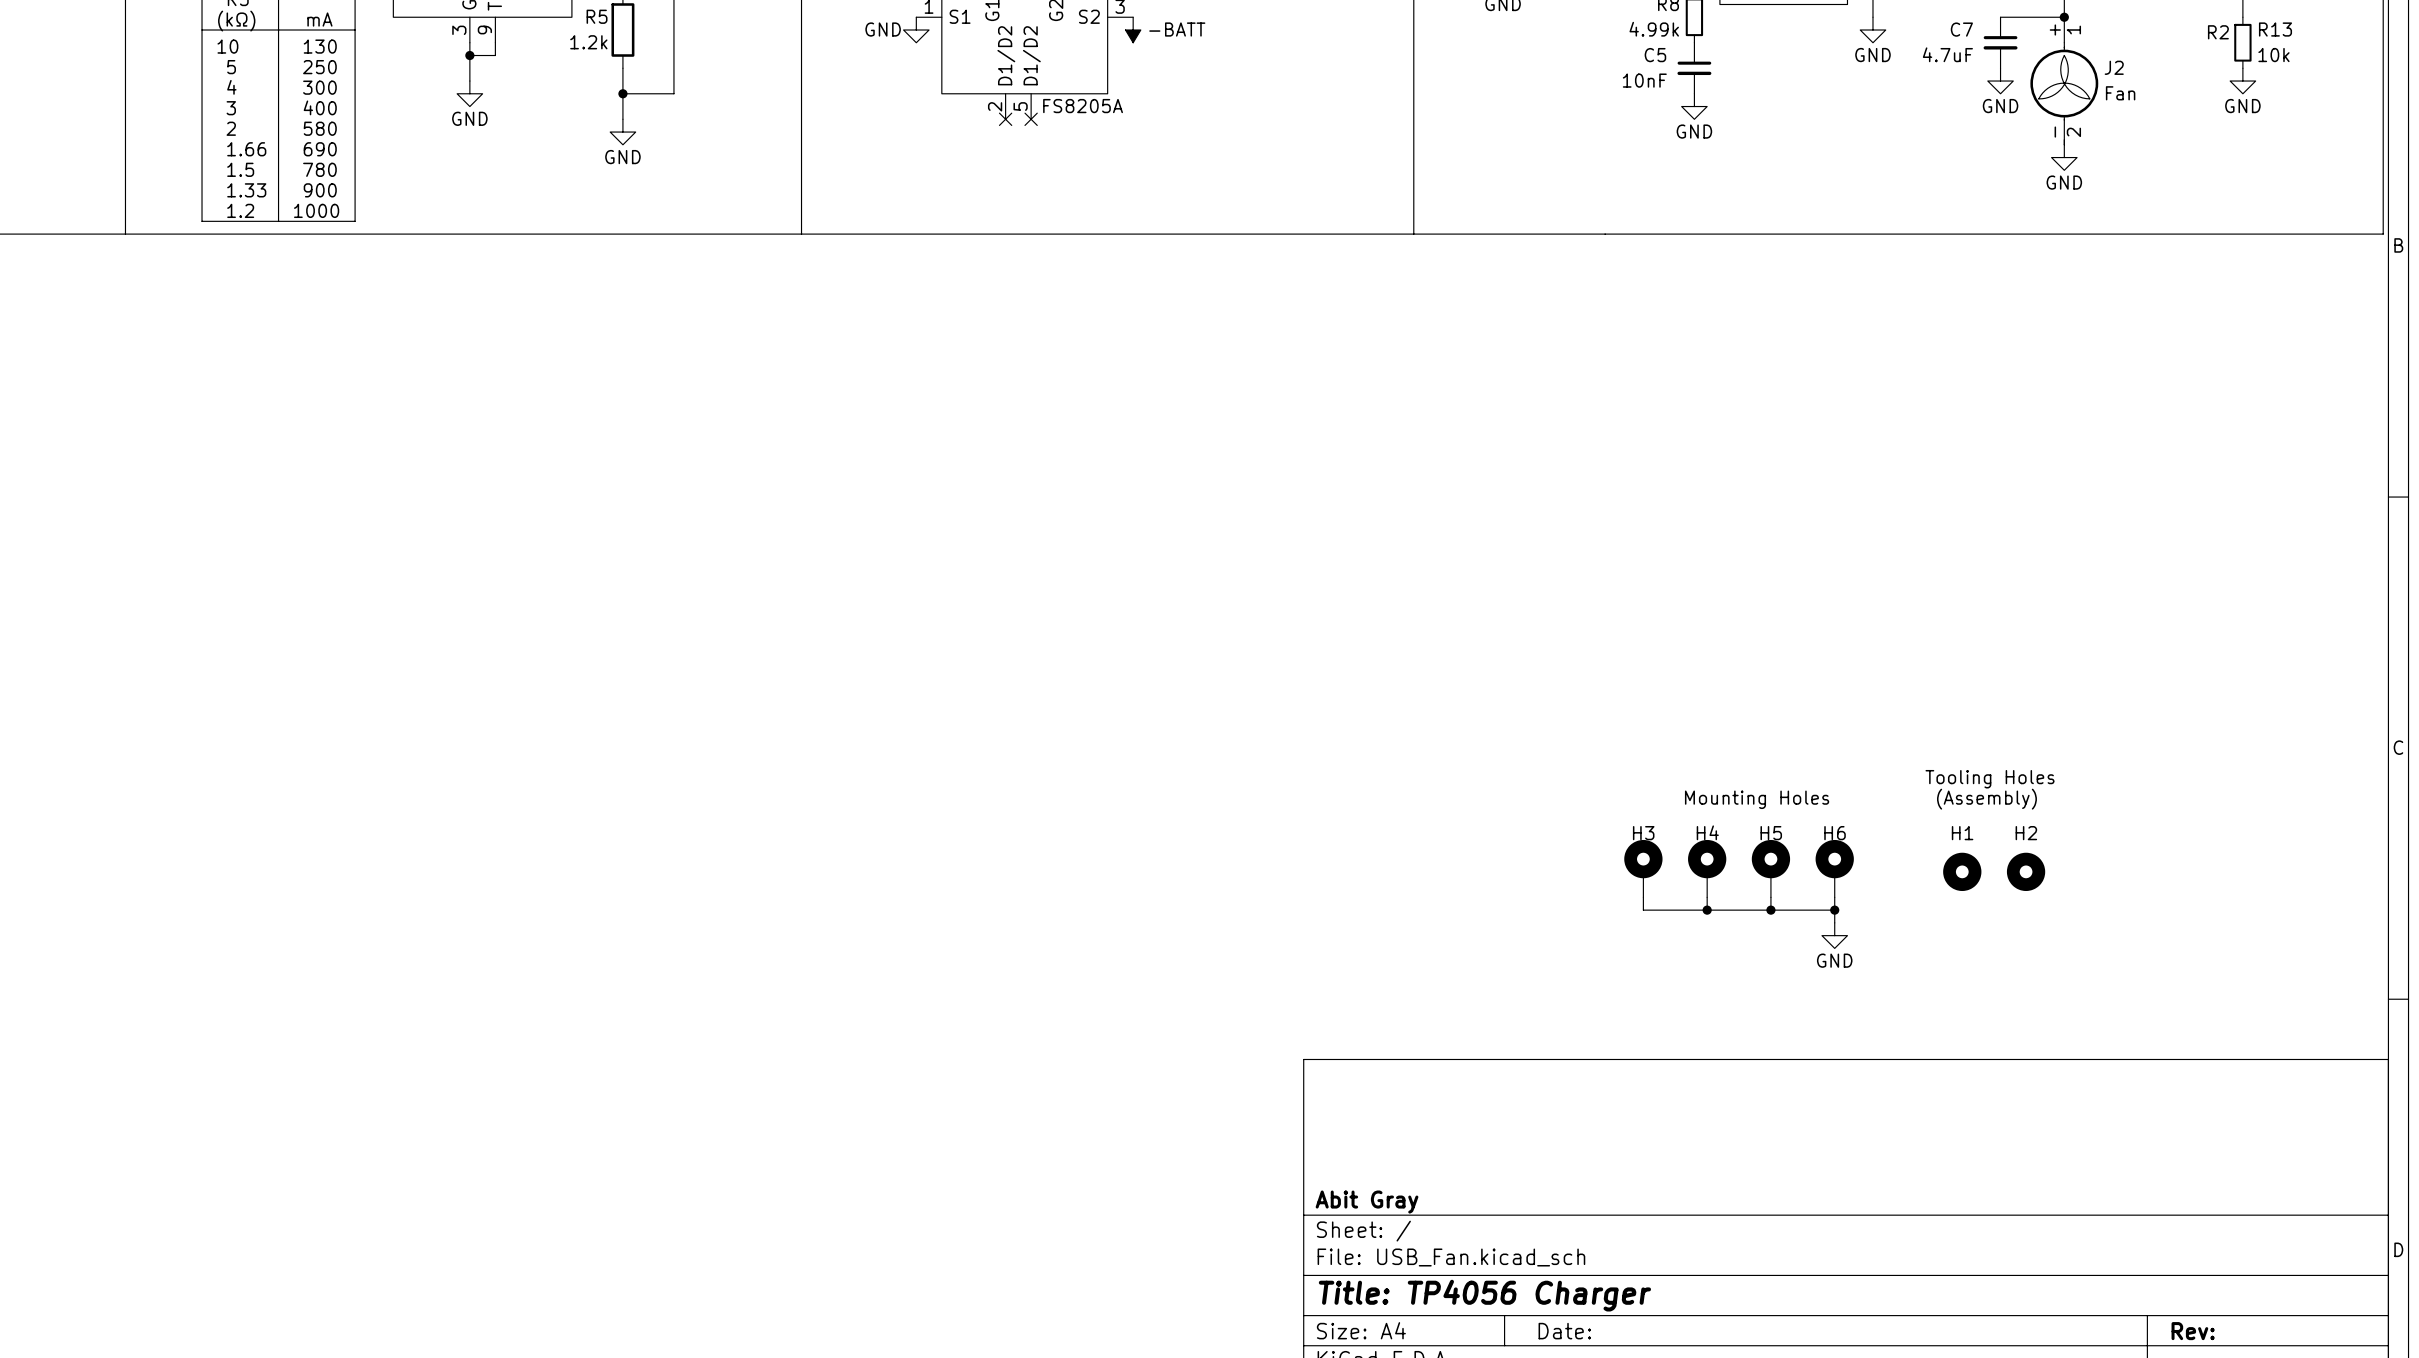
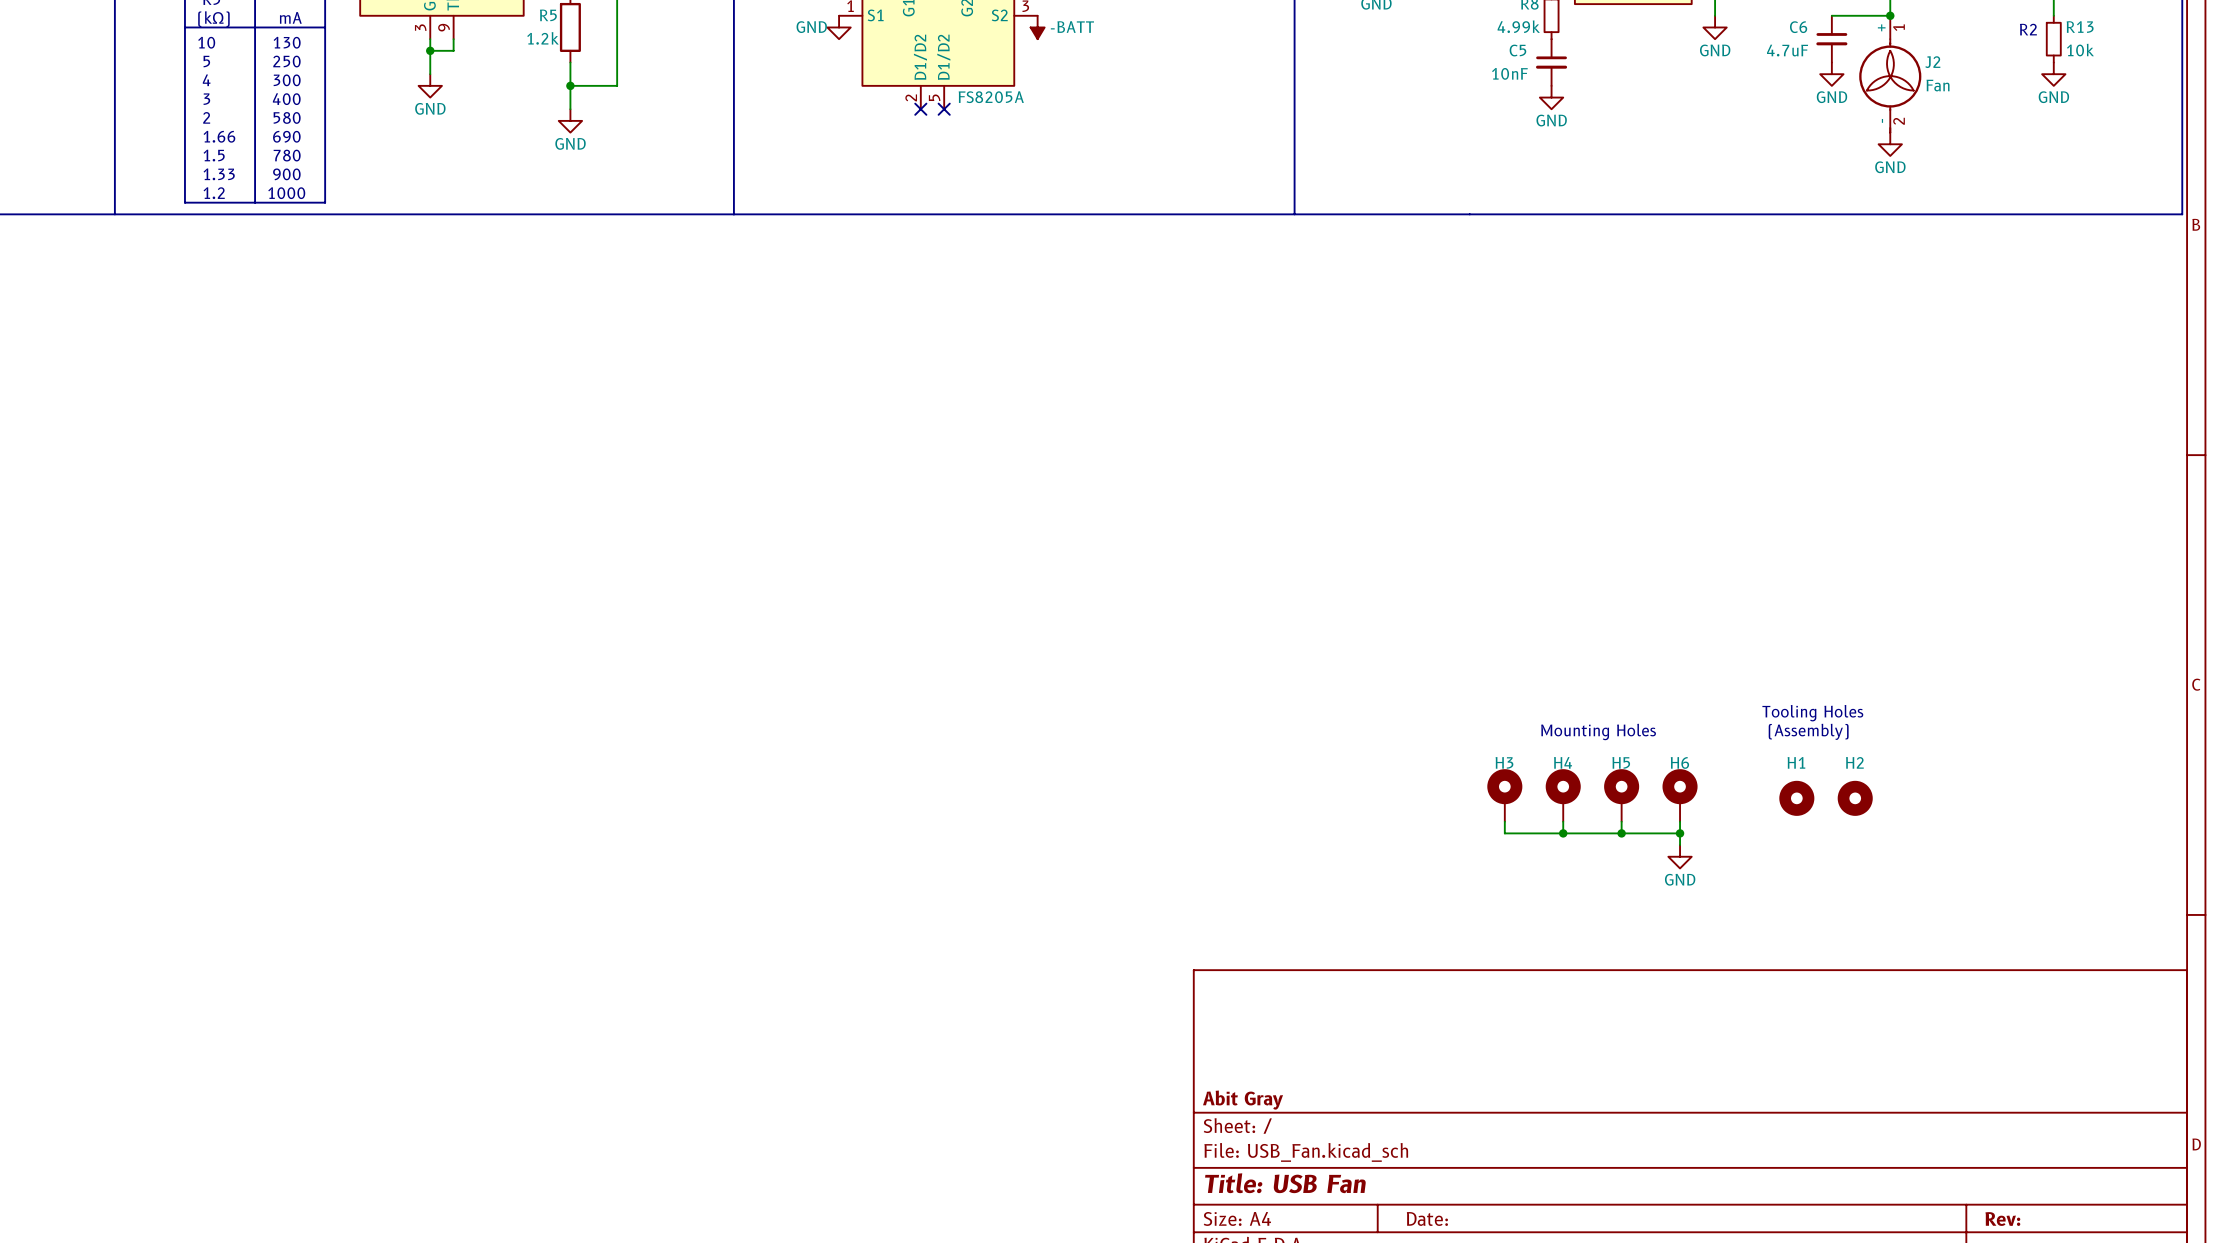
C7 name: C7 (1961, 29) -> C6 (1798, 27)
title block: Title: TP4056 Charger (1484, 1295) -> Title: USB Fan (1285, 1183)

